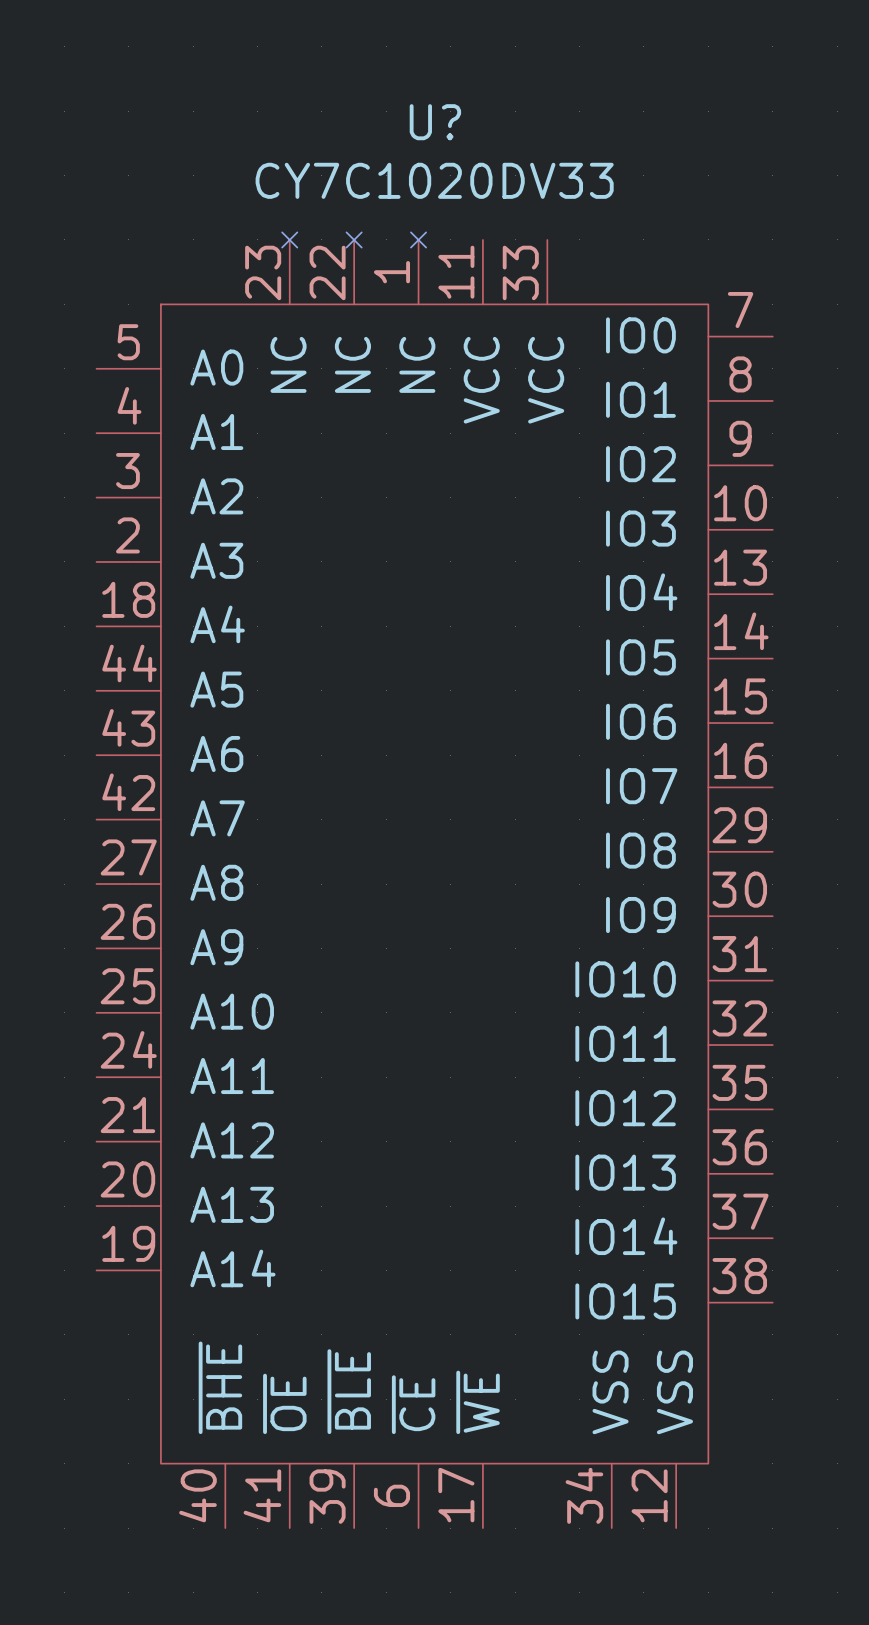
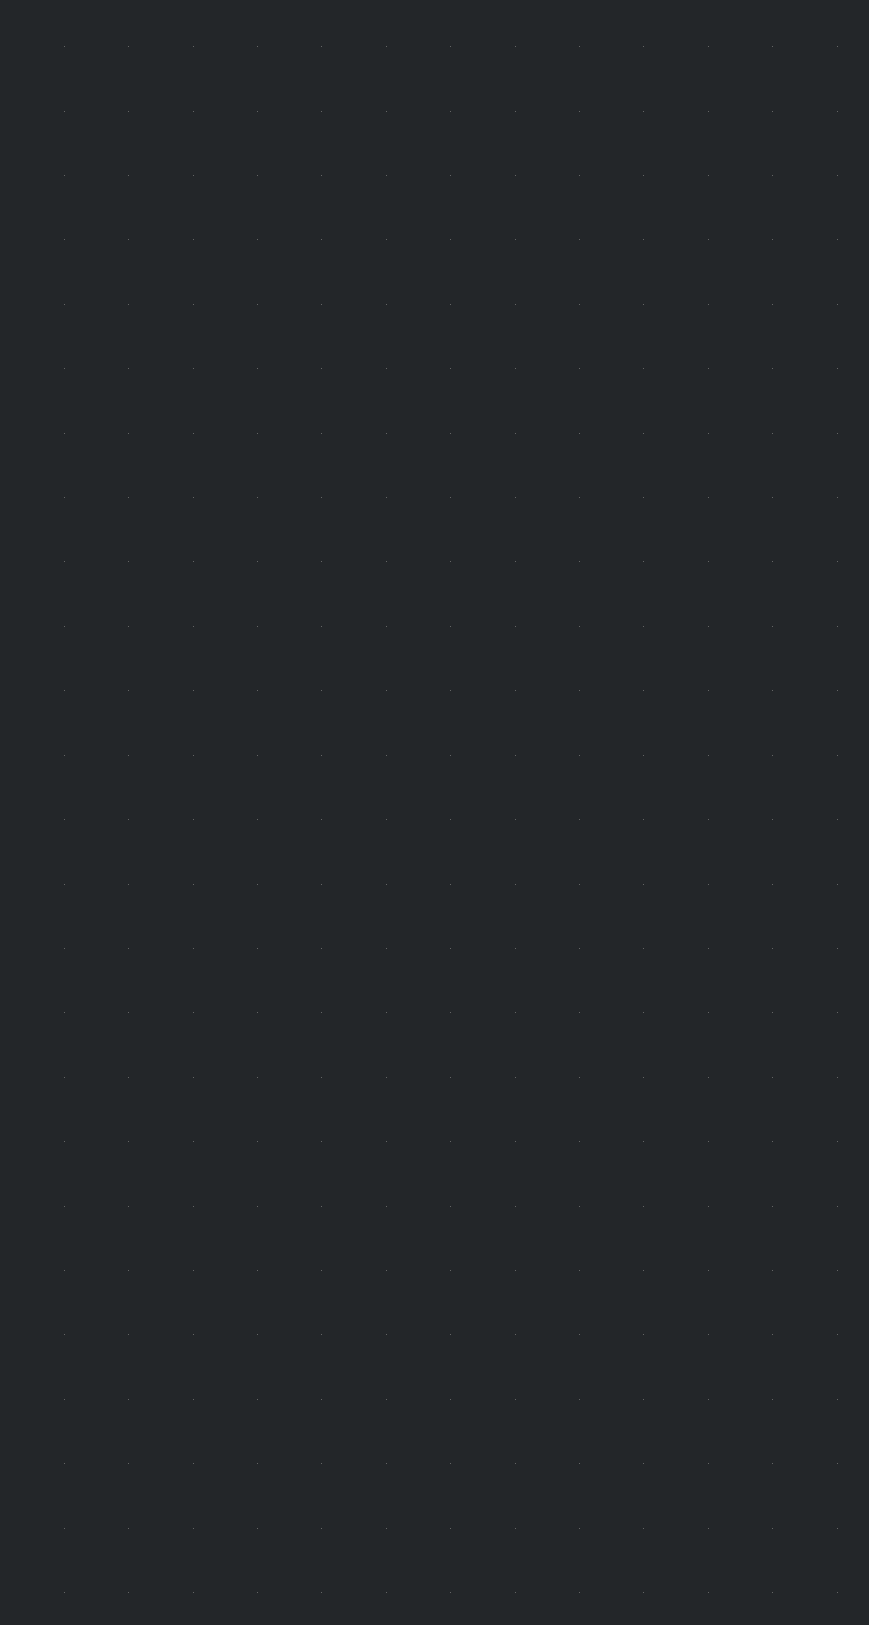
U?: CY7C1020DV33 (434, 880) -> none

